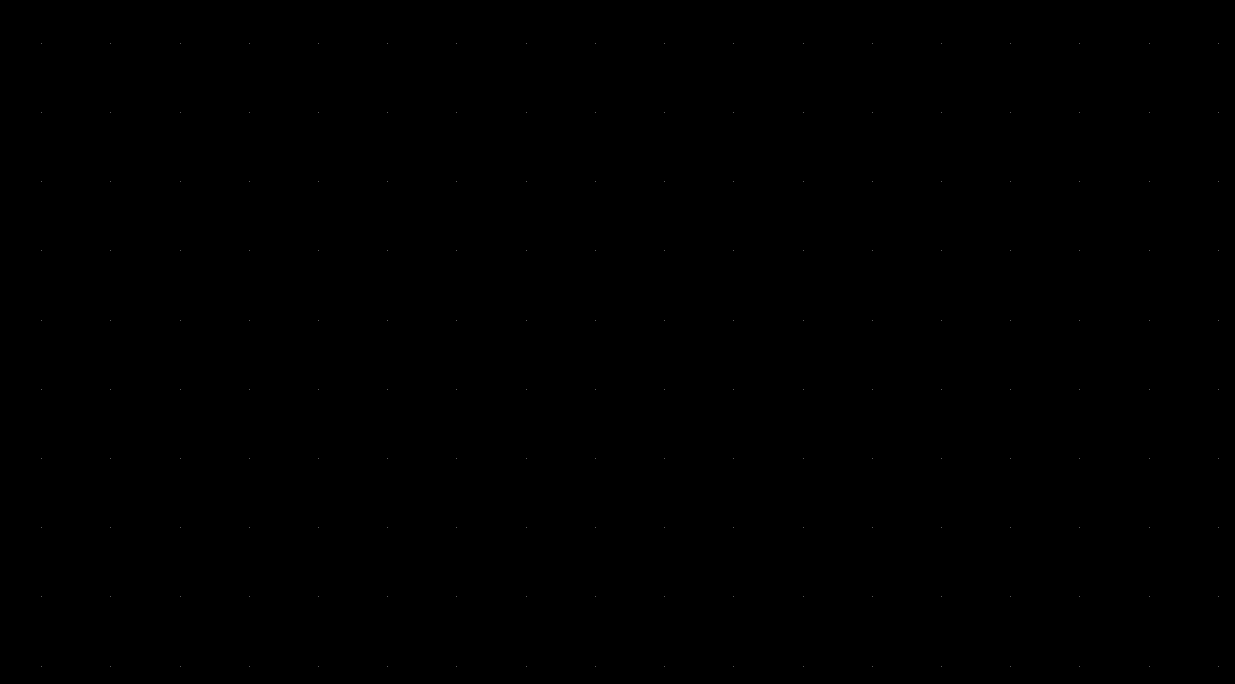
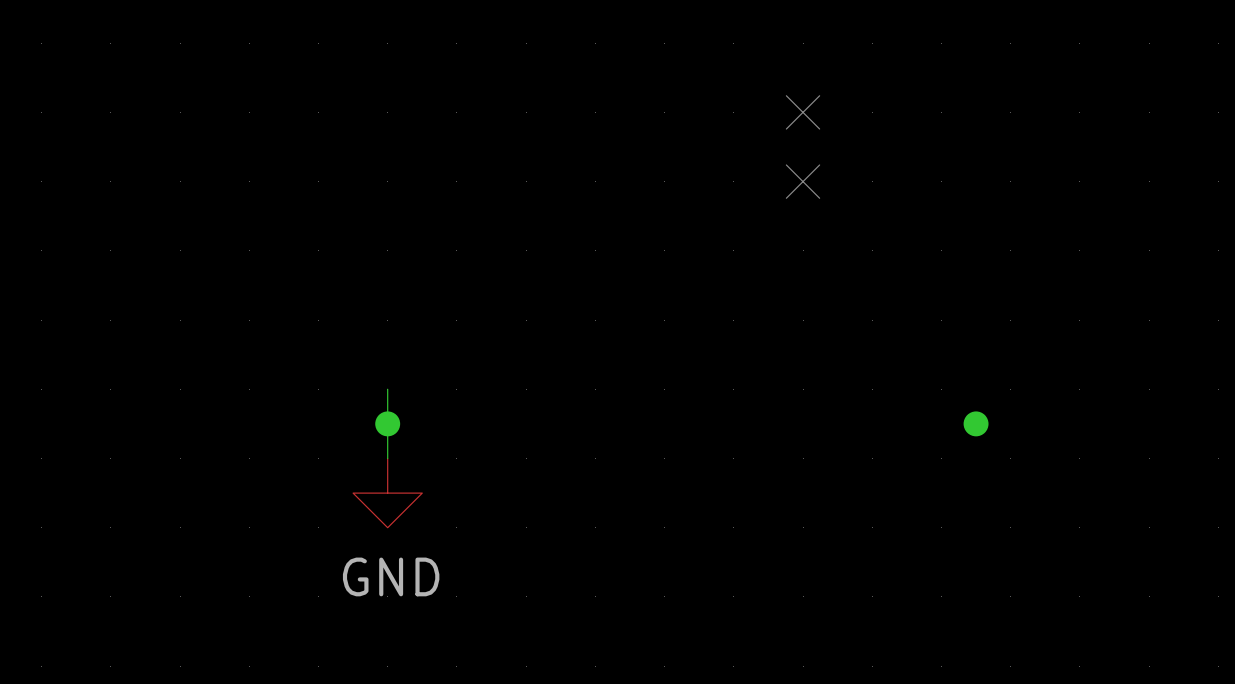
no-connect mark: none -> (803, 112)
no-connect mark: none -> (803, 181)
wire: none -> (387, 389) (387, 458)
junction: none -> (387, 423)
junction: none -> (976, 423)
power symbol: none -> GND (387, 493)

